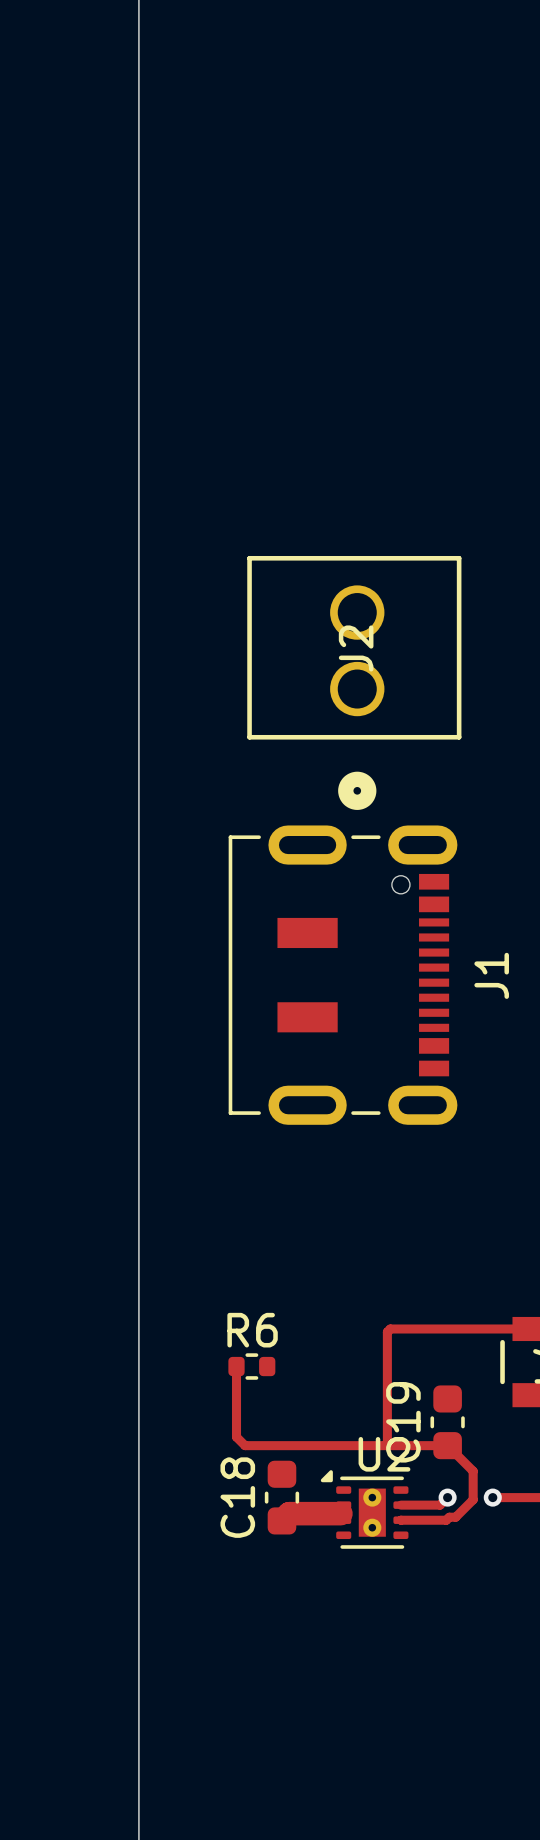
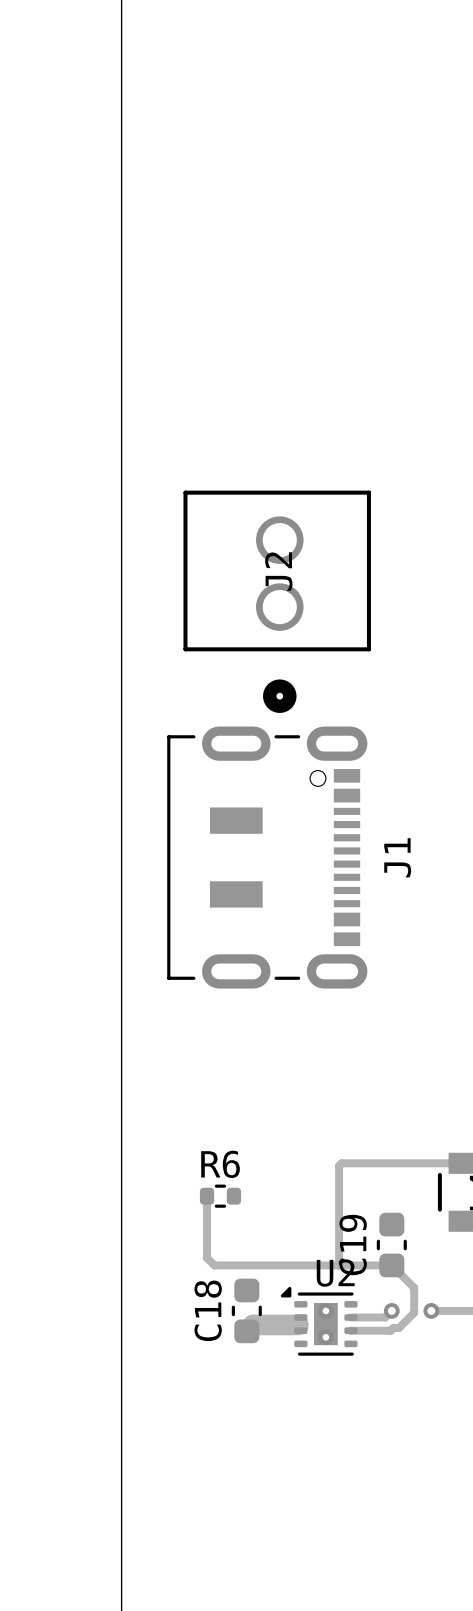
J2 position: (354, 682) -> (277, 601)
J1 position: (343, 975) -> (267, 857)

